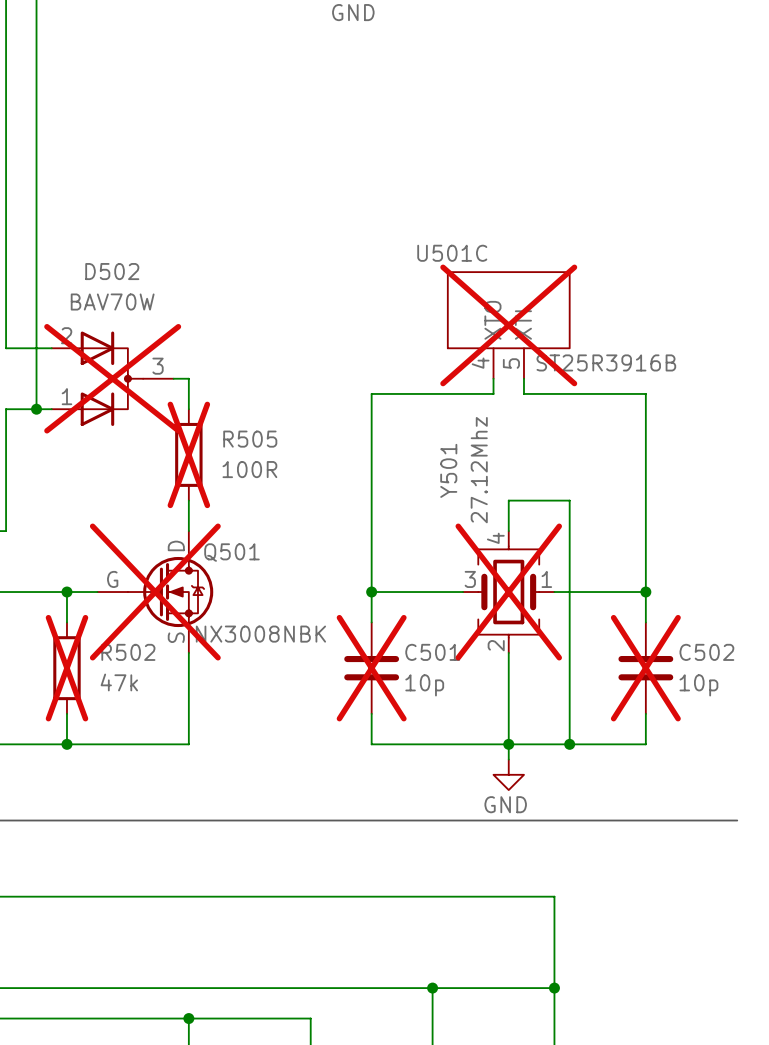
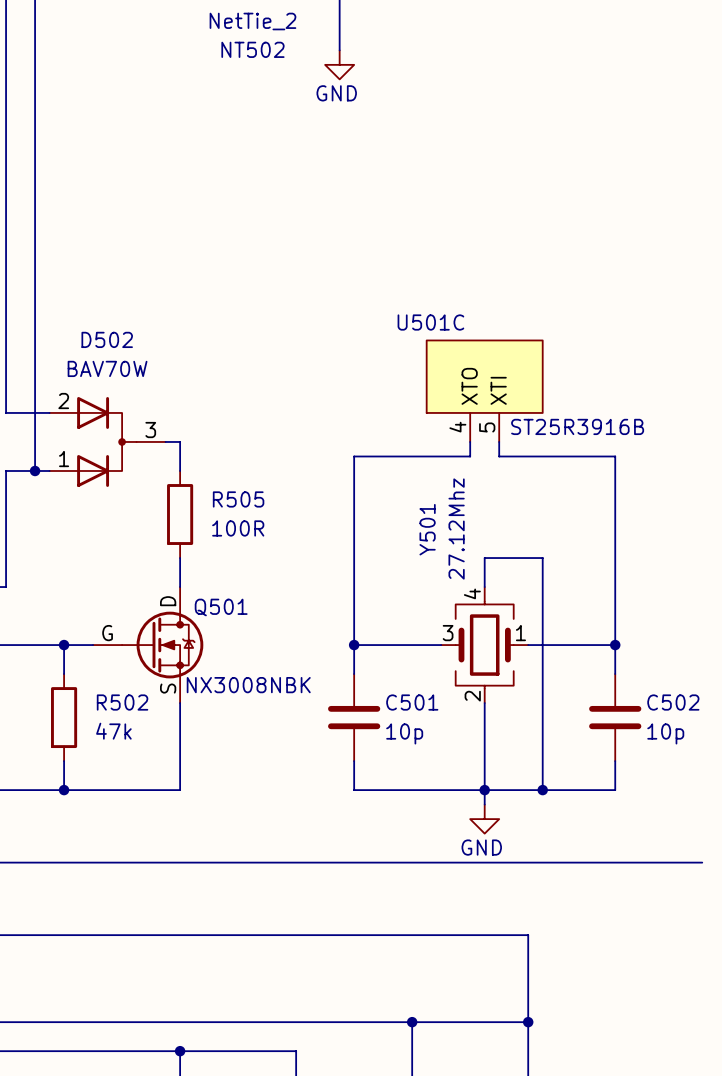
U501C do-not-place cross: (508, 325) -> none
D502 do-not-place cross: (112, 378) -> none
R505 do-not-place cross: (188, 454) -> none
Q501 do-not-place cross: (155, 592) -> none
Y501 do-not-place cross: (508, 592) -> none
R502 do-not-place cross: (66, 668) -> none
C501 do-not-place cross: (371, 668) -> none
C502 do-not-place cross: (645, 668) -> none

